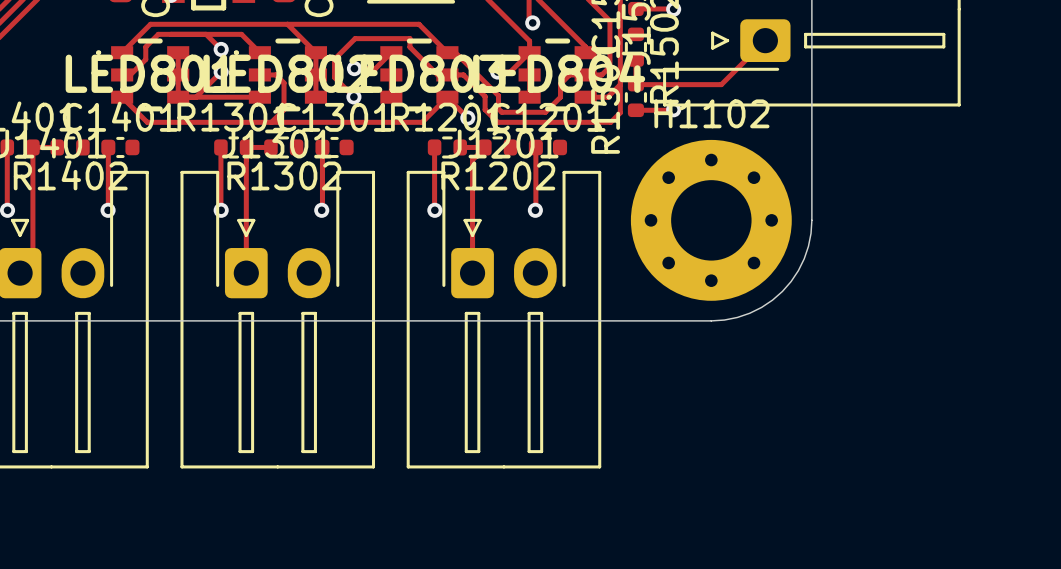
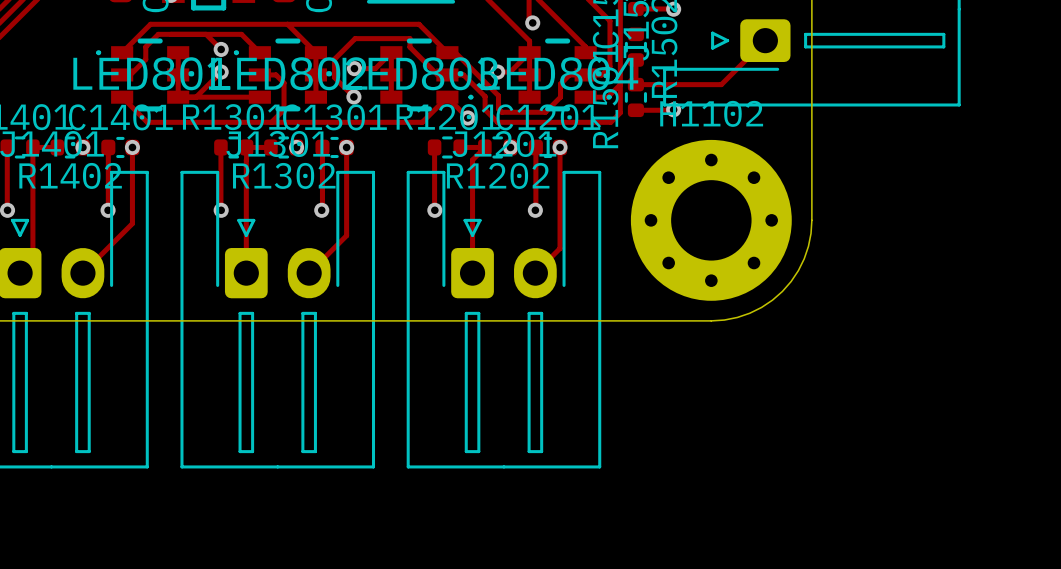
via: none -> (82, 147)
track: none -> (132, 147) (132, 223) (82, 273)
via: none -> (132, 147)
via: none -> (296, 147)
track: none -> (346, 147) (346, 235) (309, 273)
via: none -> (346, 147)
via: none -> (510, 147)
track: none -> (560, 147) (560, 248) (535, 273)
via: none -> (560, 147)

